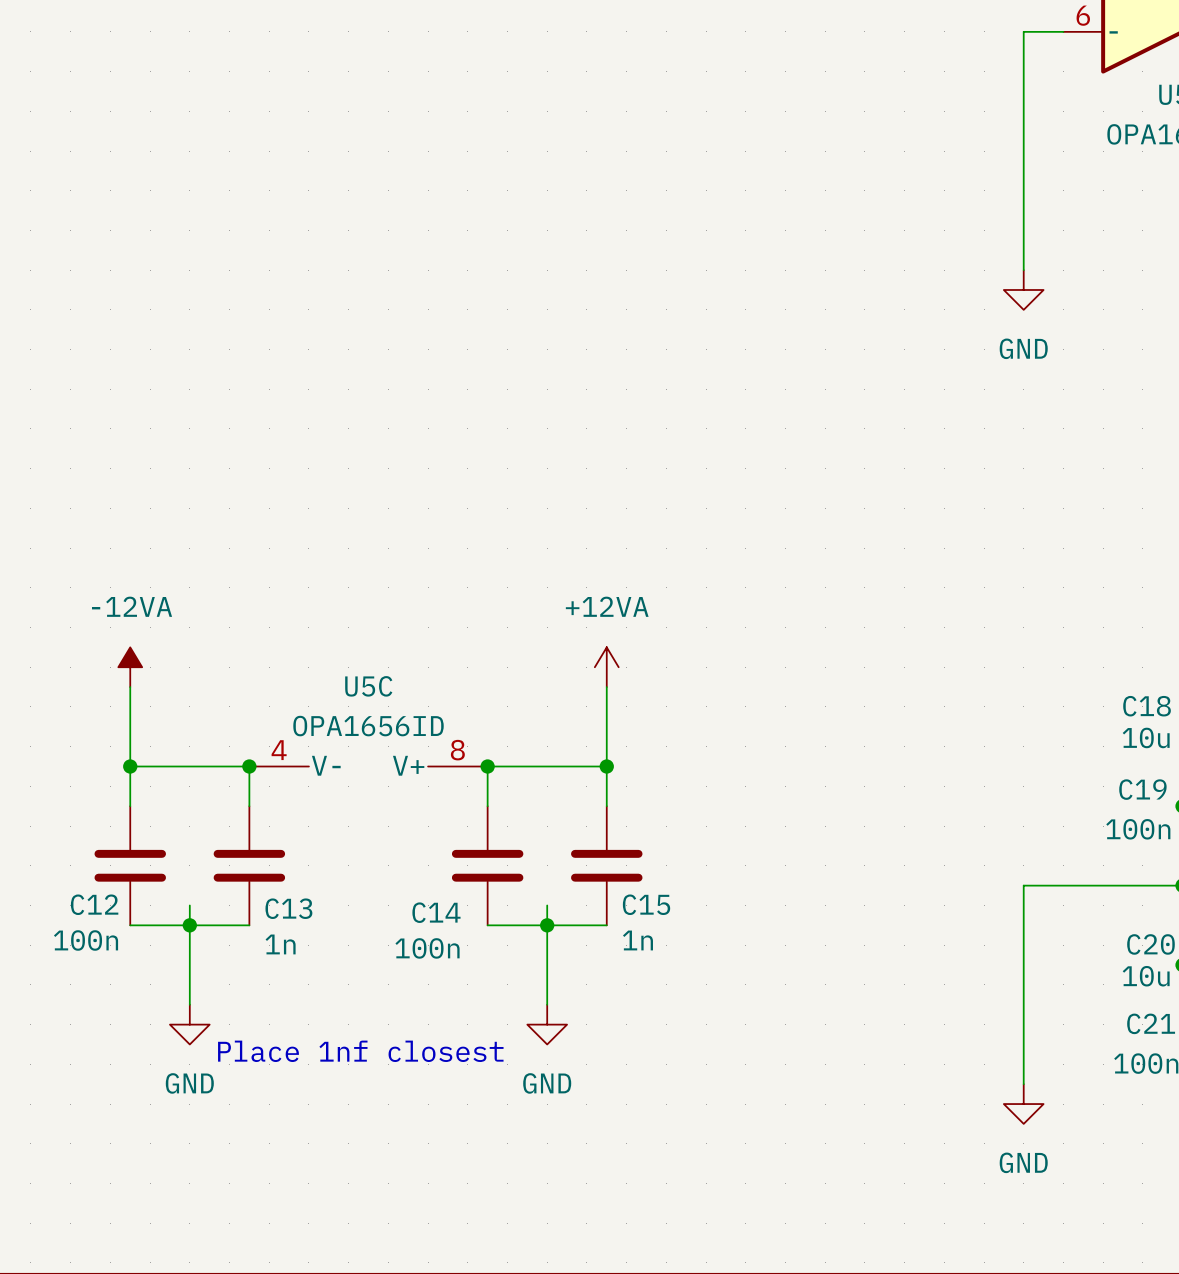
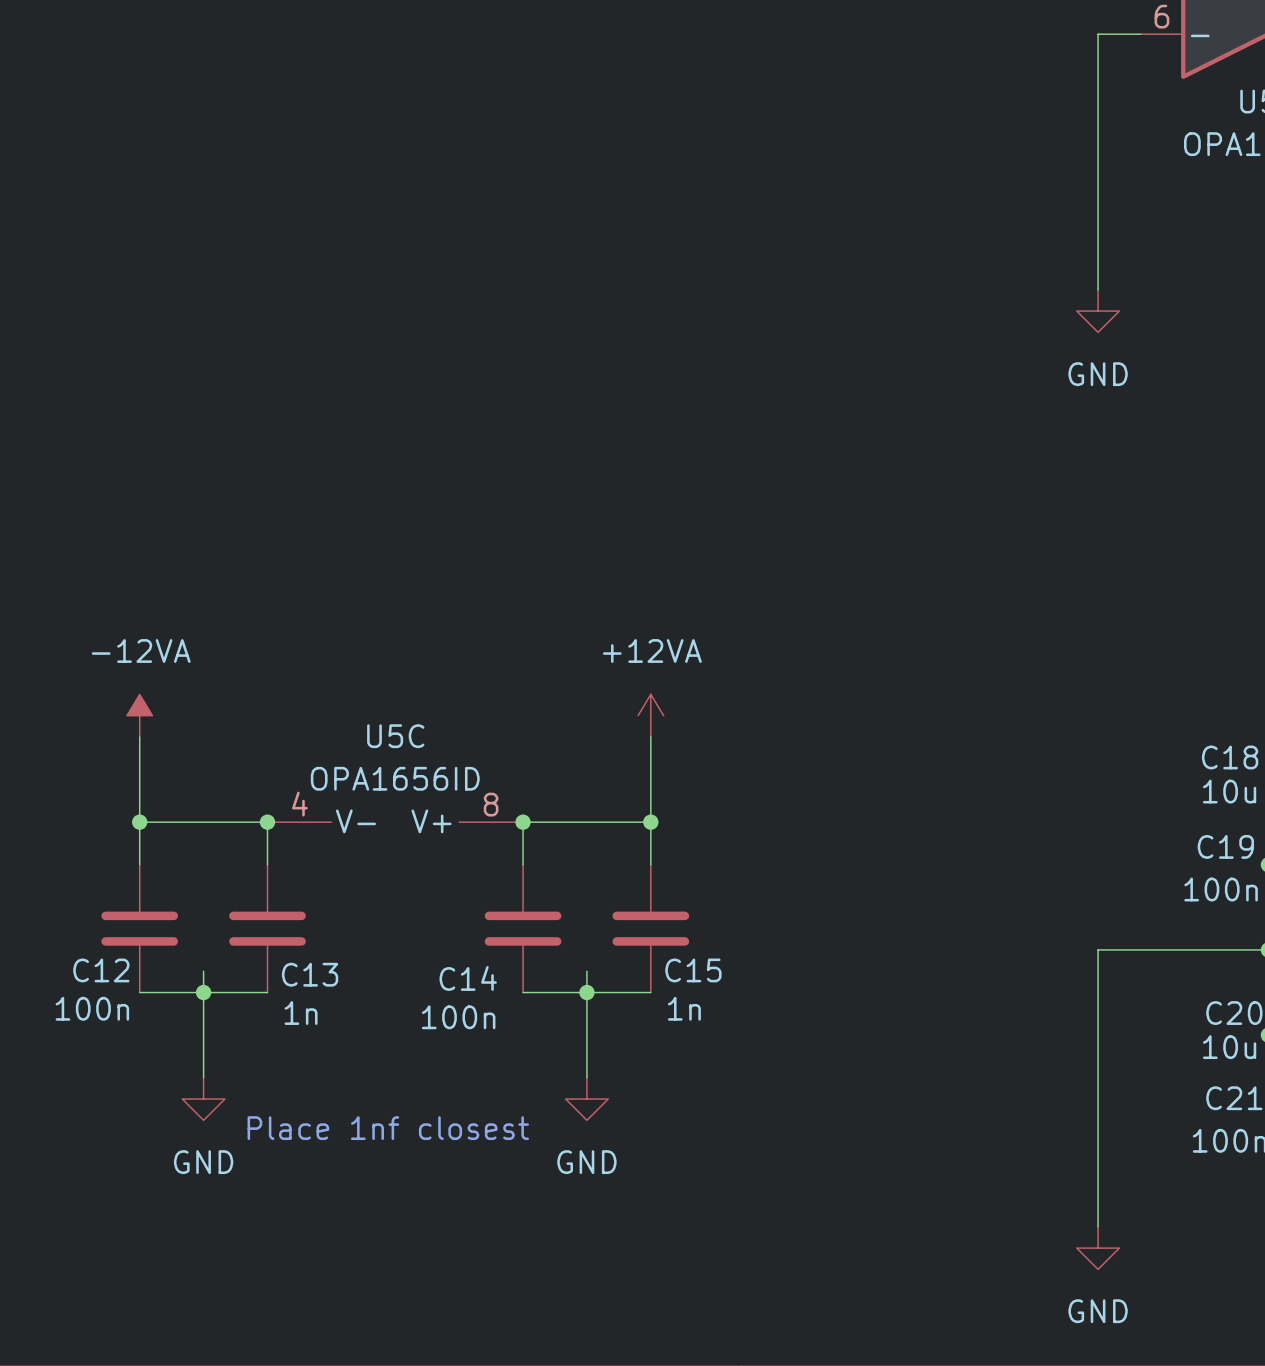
wire: none -> (1098, 1162) (1098, 1226)
power symbol position: GND (1023, 1104) -> GND (1098, 1248)

